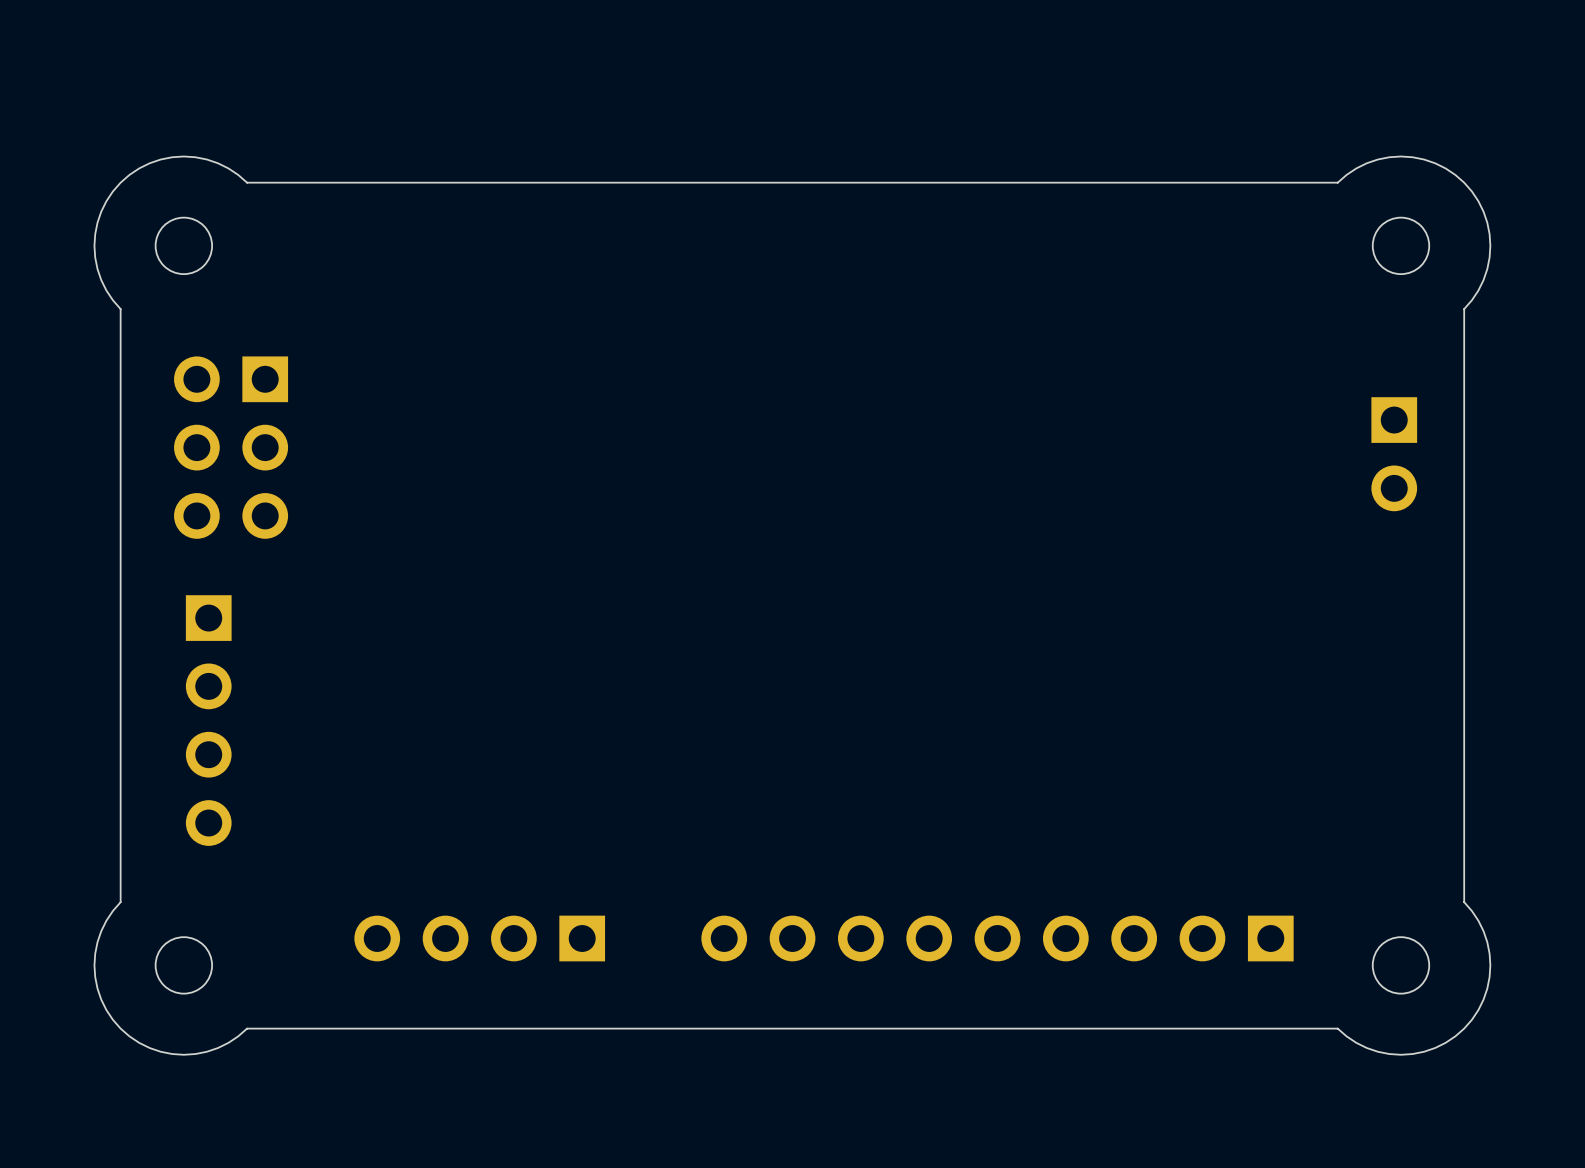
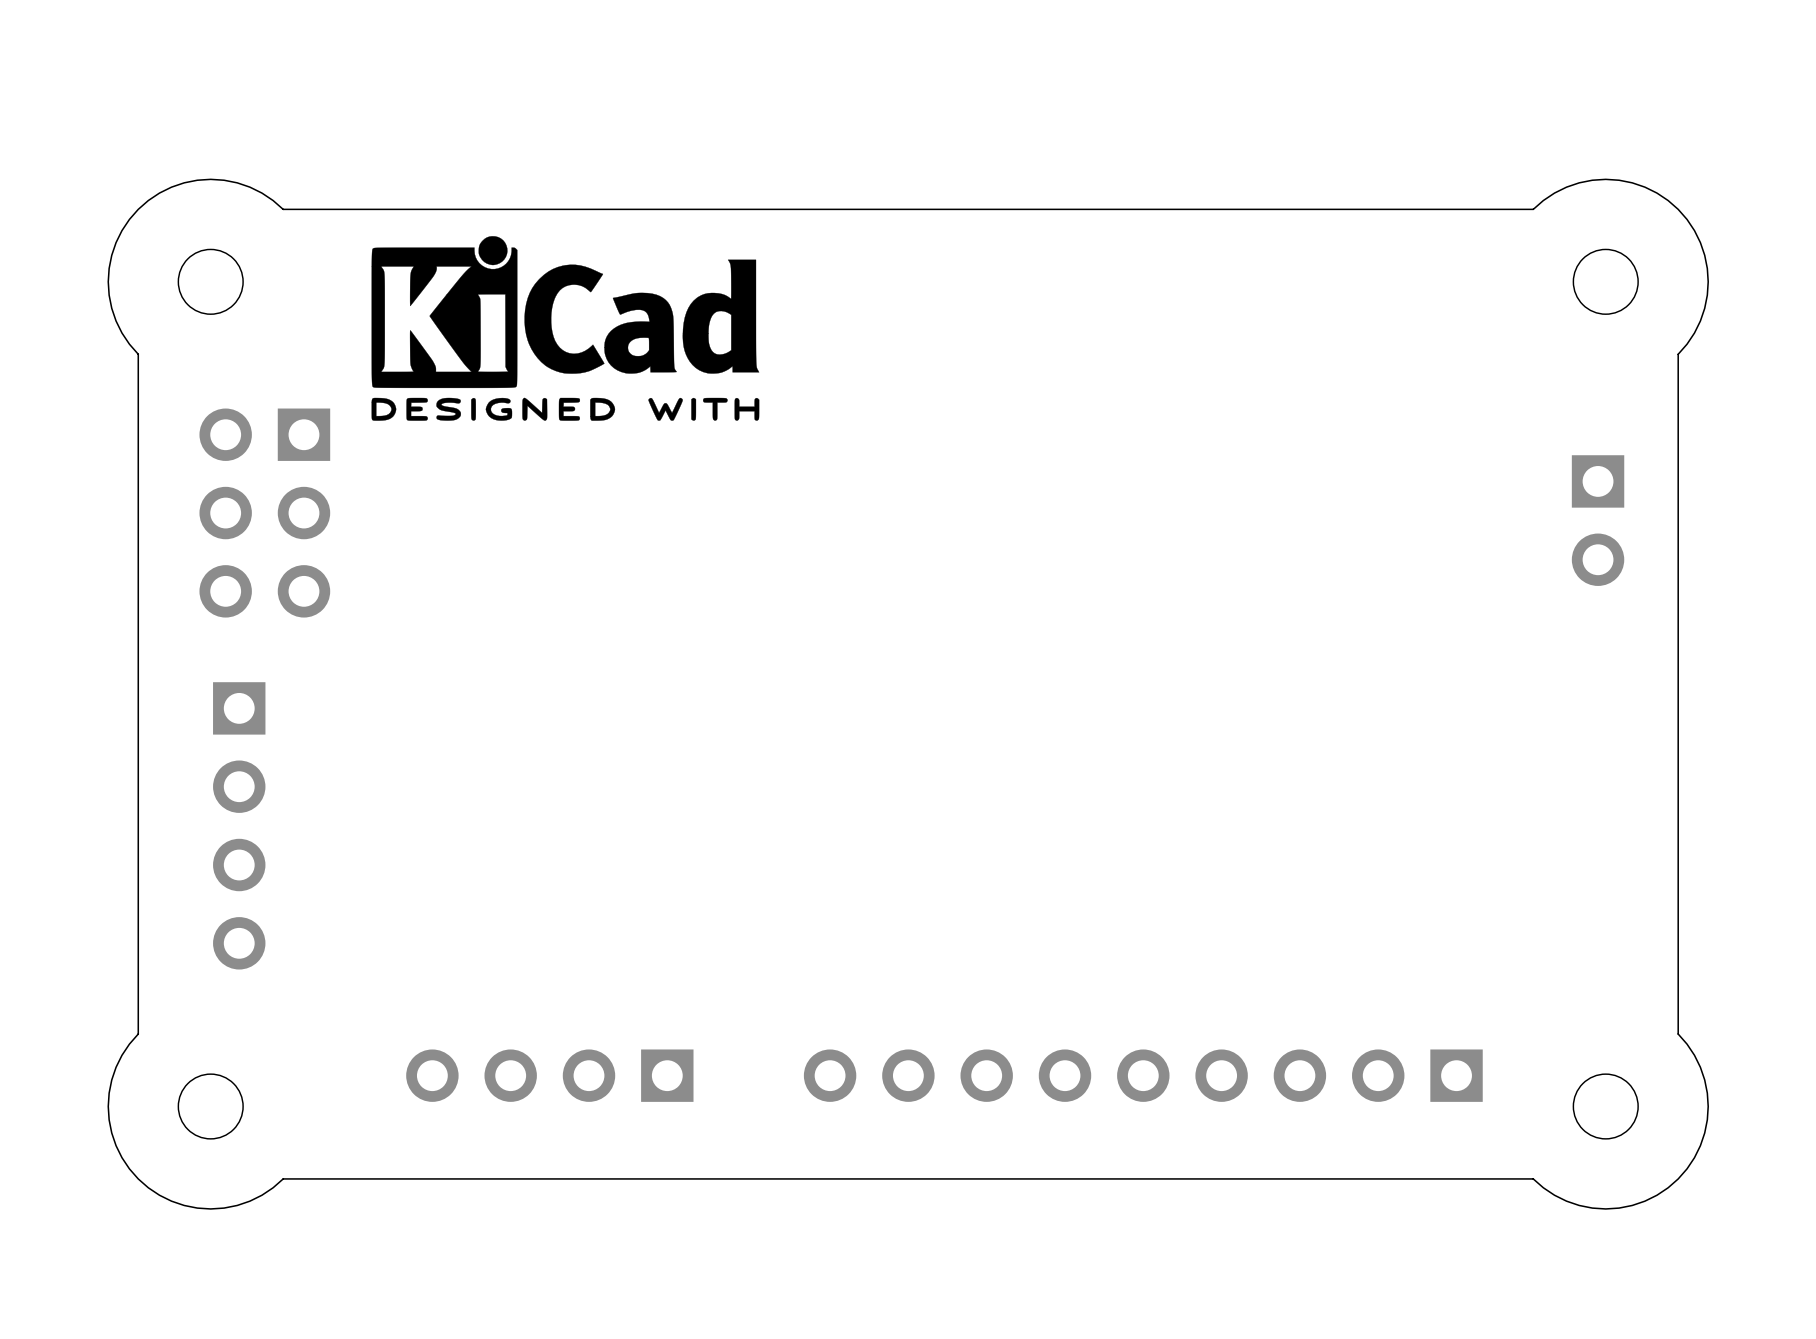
drawing: none -> [371, 236, 760, 421]

